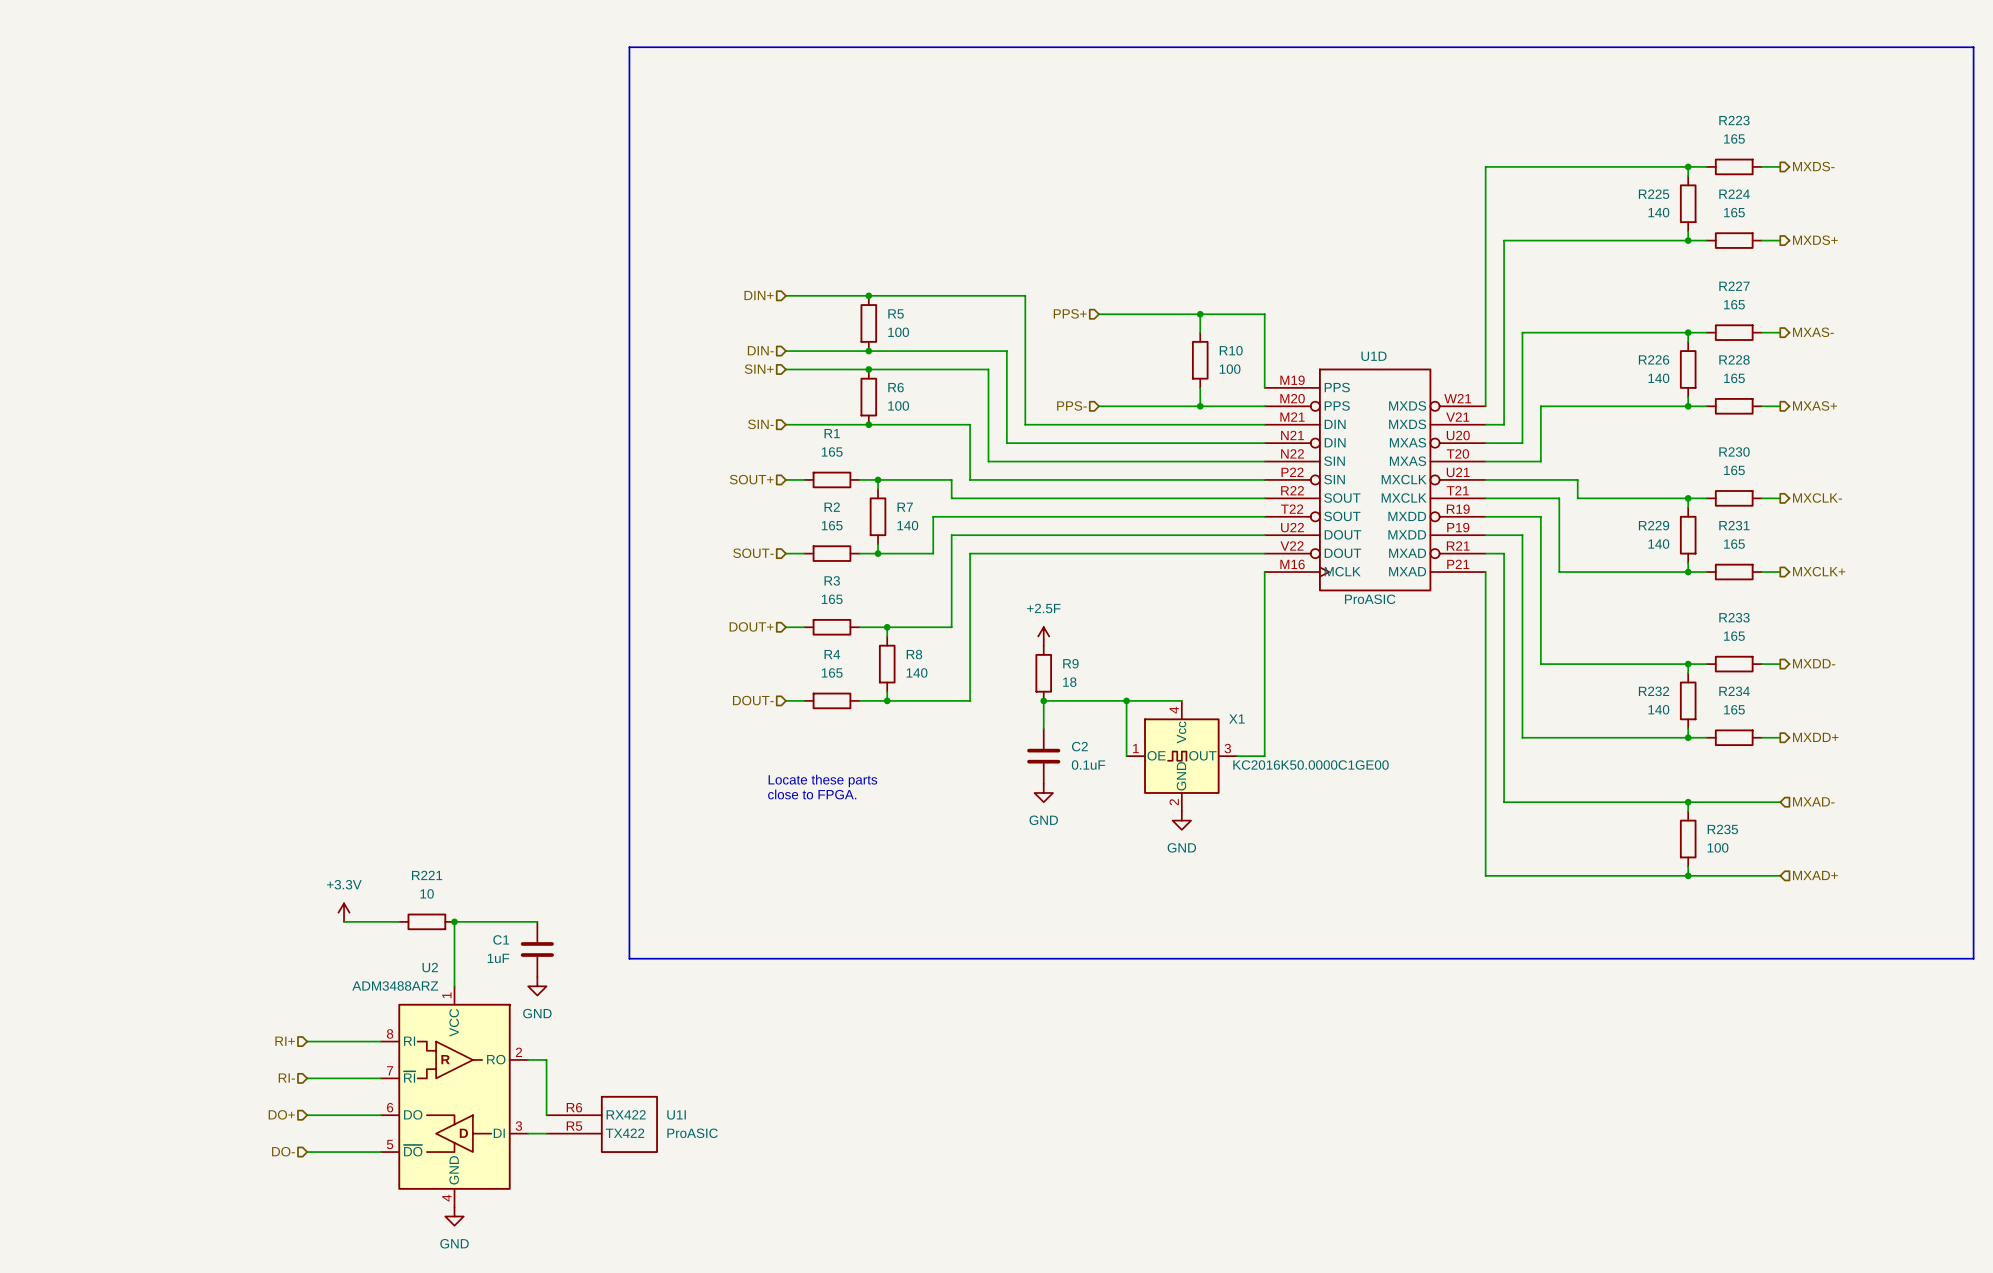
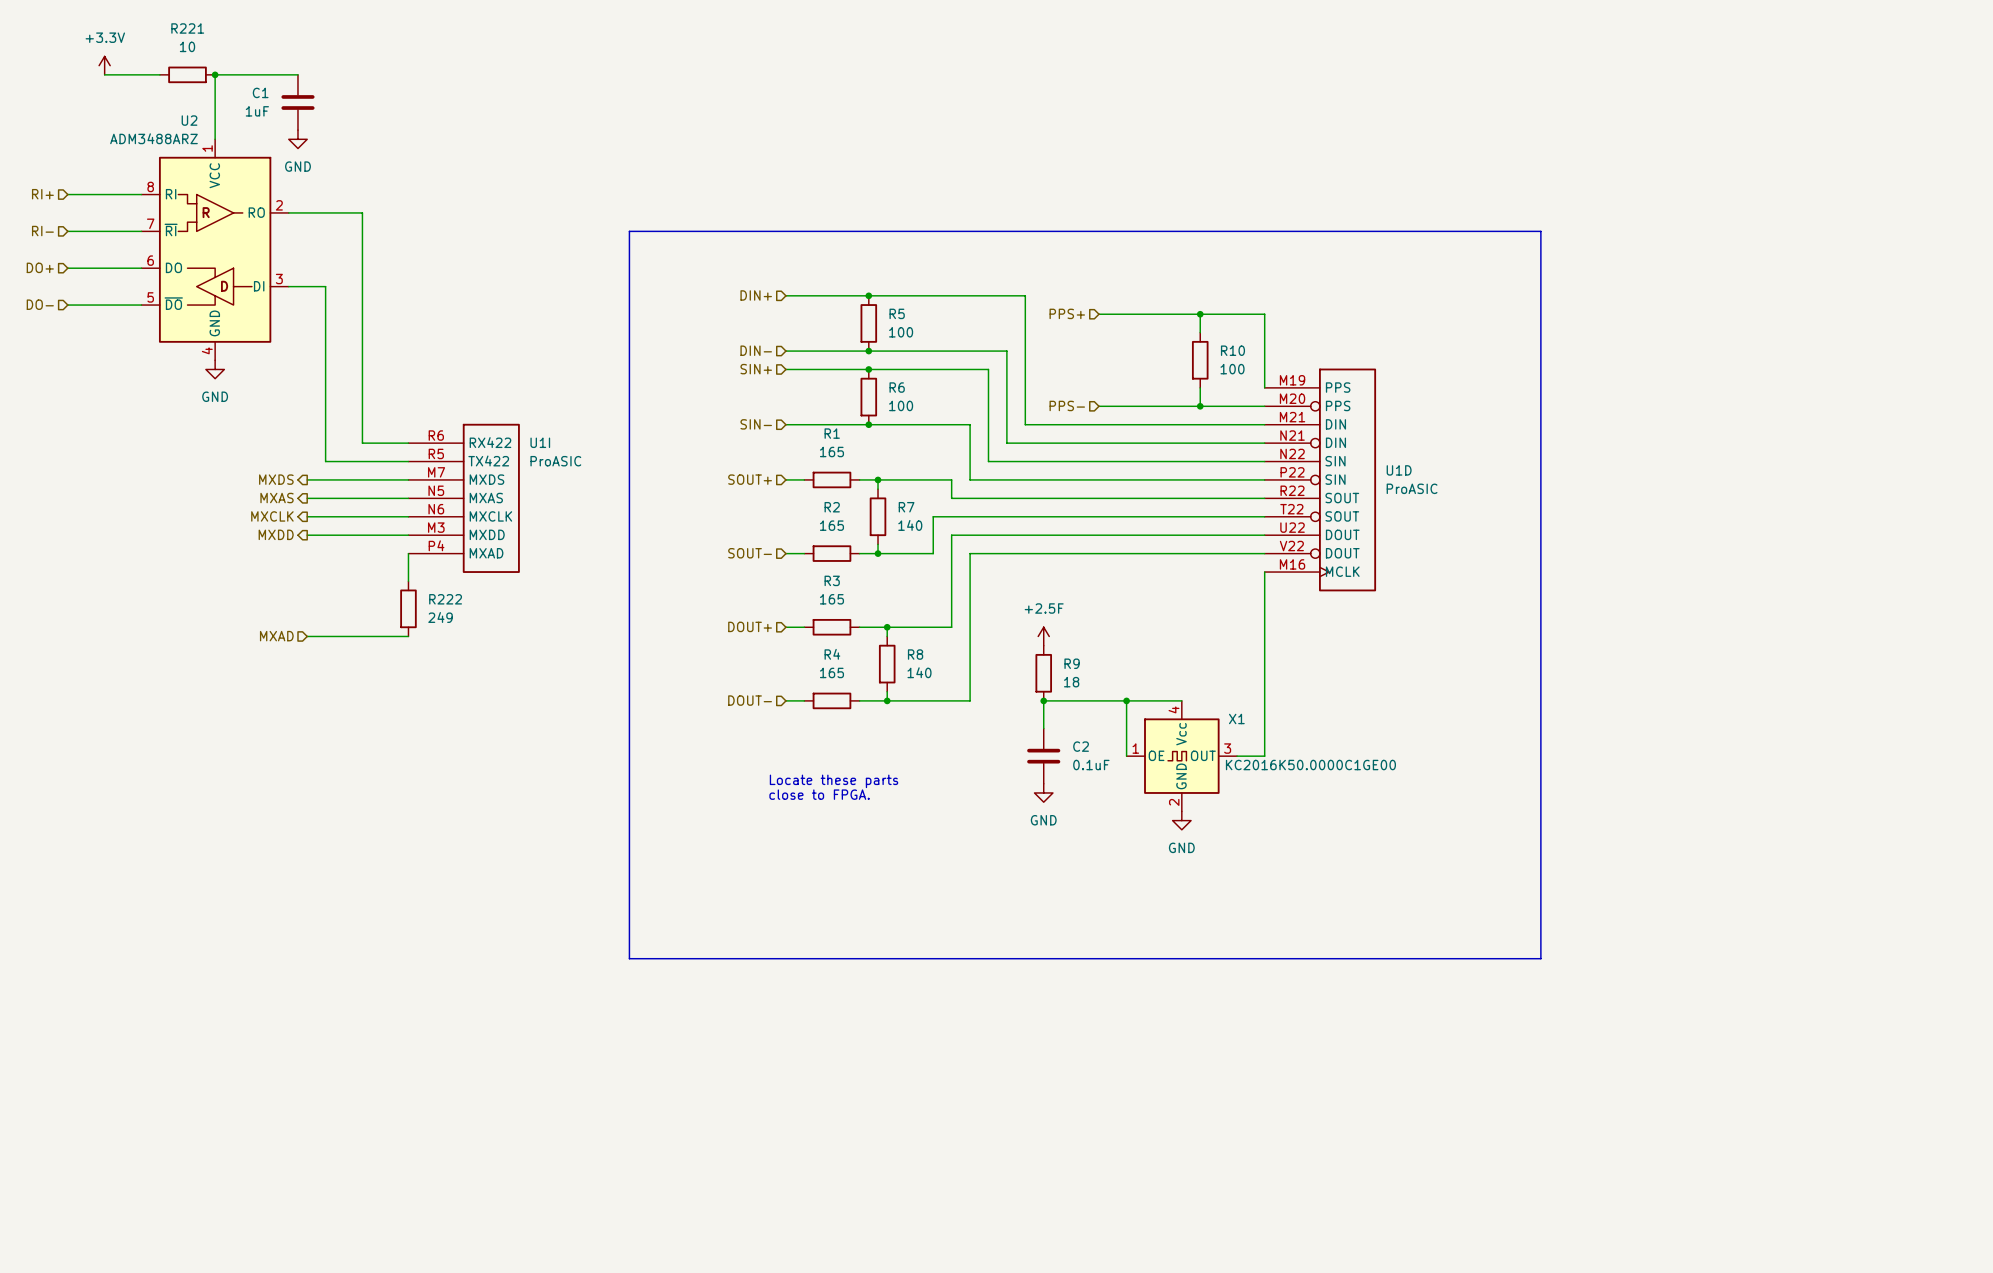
power symbol: none -> +3.3V (104, 65)
wire: none -> (104, 74) (159, 74)
junction: none -> (215, 74)
wire: none -> (297, 74) (215, 74) (215, 139)
power symbol: none -> GND (297, 139)
wire: (1688, 166) (1688, 176) -> none
junction: (1688, 166) -> none
wire: (1706, 166) (1485, 166) (1485, 406) -> none
R223: 165 (1734, 166) -> none
wire: (1761, 166) (1780, 166) -> none
hierarchical label: MXDS- (1813, 166) -> none
hierarchical label: none -> RI+ (42, 194)
wire: none -> (67, 194) (141, 194)
R225: 140 (1688, 203) -> none
wire: none -> (288, 212) (362, 212) (362, 443) (408, 443)
hierarchical label: none -> RI- (42, 231)
wire: none -> (67, 231) (141, 231)
line: (629, 231) (629, 47) (1973, 47) (1973, 958) (1540, 958) -> (629, 231) (1540, 231) (1540, 958)
wire: (1688, 231) (1688, 240) -> none
junction: (1688, 240) -> none
wire: (1706, 240) (1504, 240) (1504, 424) (1485, 424) -> none
R224: 165 (1734, 240) -> none
wire: (1761, 240) (1780, 240) -> none
hierarchical label: MXDS+ (1815, 240) -> none
hierarchical label: none -> DO+ (40, 267)
wire: none -> (67, 268) (141, 268)
wire: none -> (288, 286) (325, 286) (325, 461) (408, 461)
hierarchical label: none -> DO- (40, 304)
wire: none -> (67, 305) (141, 305)
wire: (1688, 332) (1688, 341) -> none
junction: (1688, 332) -> none
wire: (1706, 332) (1522, 332) (1522, 443) (1485, 443) -> none
R227: 165 (1734, 332) -> none
wire: (1761, 332) (1780, 332) -> none
hierarchical label: MXAS- (1813, 332) -> none
U1D name position: U1D (1374, 356) -> U1D (1399, 470)
U1D symbol: [1264, 368, 1486, 592] -> [1264, 368, 1377, 592]
power symbol: none -> GND (215, 369)
R226: 140 (1688, 369) -> none
wire: (1688, 397) (1688, 406) -> none
hierarchical label: MXAS+ (1815, 405) -> none
junction: (1688, 406) -> none
wire: (1706, 406) (1540, 406) (1540, 461) (1485, 461) -> none
R228: 165 (1734, 406) -> none
wire: (1761, 406) (1780, 406) -> none
hierarchical label: none -> MXDS (276, 479)
wire: none -> (307, 479) (408, 479)
wire: (1485, 479) (1577, 479) (1577, 498) (1706, 498) -> none
hierarchical label: none -> MXAS (277, 498)
wire: none -> (307, 498) (408, 498)
wire: (1485, 498) (1559, 498) (1559, 572) (1706, 572) -> none
wire: (1688, 498) (1688, 507) -> none
junction: (1688, 498) -> none
R230: 165 (1734, 498) -> none
wire: (1761, 498) (1780, 498) -> none
hierarchical label: MXCLK- (1817, 498) -> none
hierarchical label: none -> MXCLK (272, 516)
wire: none -> (307, 516) (408, 516)
wire: (1485, 516) (1540, 516) (1540, 664) (1706, 664) -> none
hierarchical label: none -> MXDD (276, 534)
wire: none -> (307, 535) (408, 535)
wire: (1485, 535) (1522, 535) (1522, 737) (1706, 737) -> none
R229: 140 (1688, 535) -> none
wire: none -> (408, 553) (408, 581)
wire: (1485, 553) (1504, 553) (1504, 802) (1780, 802) -> none
wire: (1688, 562) (1688, 572) -> none
hierarchical label: MXCLK+ (1819, 571) -> none
wire: (1485, 572) (1485, 875) (1780, 875) -> none
junction: (1688, 572) -> none
R231: 165 (1734, 572) -> none
wire: (1761, 572) (1780, 572) -> none
U1D value position: ProASIC (1370, 599) -> ProASIC (1412, 488)
R222: none -> 249 (408, 608)
hierarchical label: none -> MXAD (276, 636)
wire: none -> (307, 636) (408, 636)
hierarchical label: MXDD- (1814, 663) -> none
wire: (1688, 664) (1688, 673) -> none
junction: (1688, 664) -> none
R233: 165 (1734, 664) -> none
wire: (1761, 664) (1780, 664) -> none
R232: 140 (1688, 700) -> none
wire: (1688, 728) (1688, 737) -> none
junction: (1688, 737) -> none
R234: 165 (1734, 737) -> none
wire: (1761, 737) (1780, 737) -> none
hierarchical label: MXDD+ (1815, 737) -> none
hierarchical label: MXAD- (1813, 801) -> none
wire: (1688, 802) (1688, 811) -> none
junction: (1688, 802) -> none
R235: 100 (1688, 839) -> none
wire: (1688, 866) (1688, 875) -> none
junction: (1688, 875) -> none
hierarchical label: MXAD+ (1815, 875) -> none
power symbol: +3.3V (344, 912) -> none
wire: (344, 921) (399, 921) -> none
R221 position: (426, 921) -> (187, 74)
junction: (454, 921) -> none
wire: (537, 921) (454, 921) (454, 986) -> none
C1 position: (537, 949) -> (297, 102)
power symbol: GND (537, 986) -> none
hierarchical label: RI+ (285, 1041) -> none
wire: (307, 1041) (380, 1041) -> none
wire: (528, 1059) (546, 1059) (546, 1115) -> none
hierarchical label: RI- (286, 1078) -> none
wire: (307, 1078) (380, 1078) -> none
U1I symbol: [546, 1095, 658, 1153] -> [408, 423, 520, 573]
U2 position: (454, 1096) -> (215, 249)
hierarchical label: DO+ (281, 1114) -> none
U1I name position: U1I (676, 1114) -> U1I (540, 442)
wire: (307, 1115) (380, 1115) -> none
wire: (528, 1133) (546, 1133) -> none
U1I value position: ProASIC (692, 1133) -> ProASIC (555, 461)
hierarchical label: DO- (283, 1151) -> none
wire: (307, 1152) (380, 1152) -> none
power symbol: GND (454, 1216) -> none

